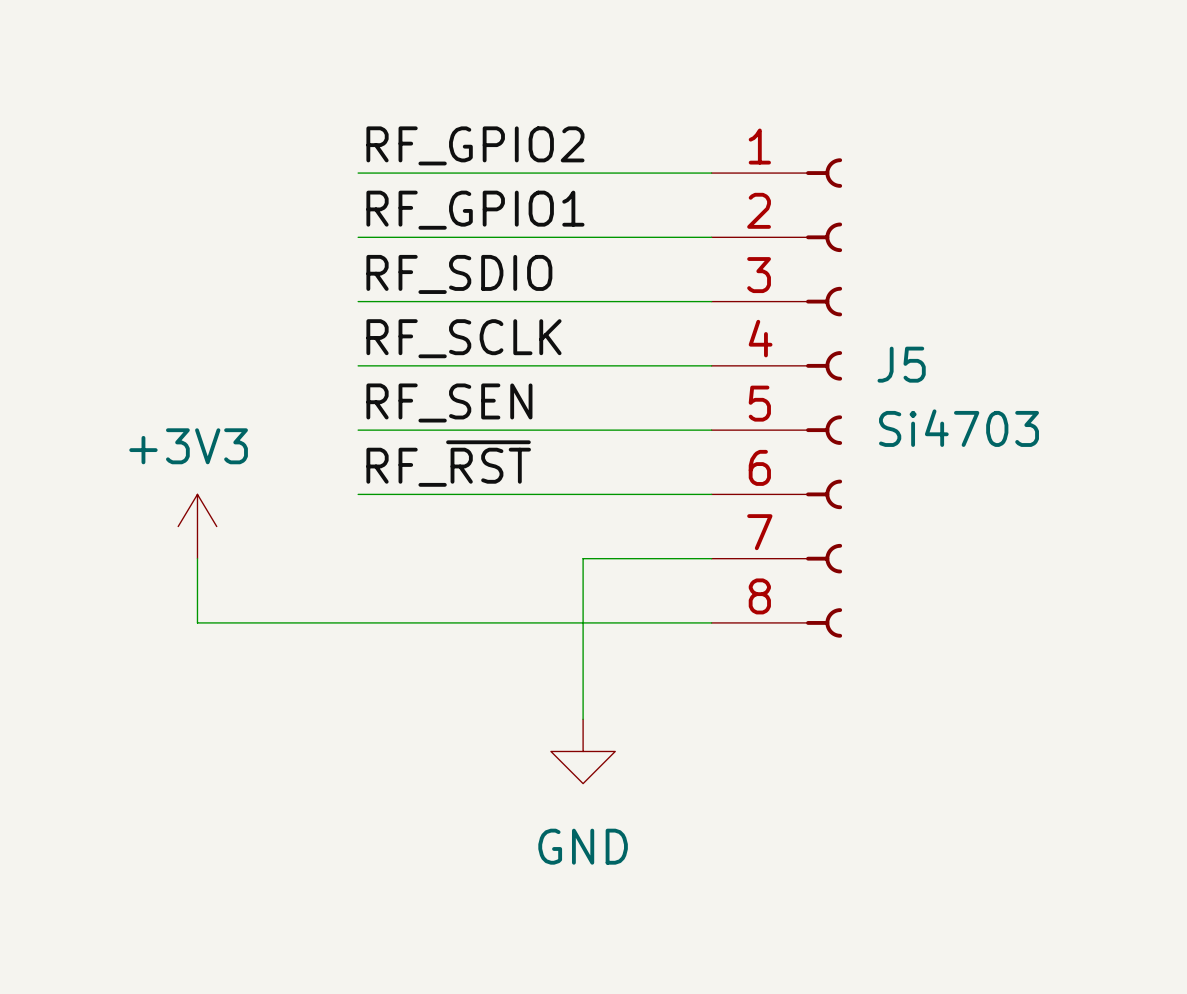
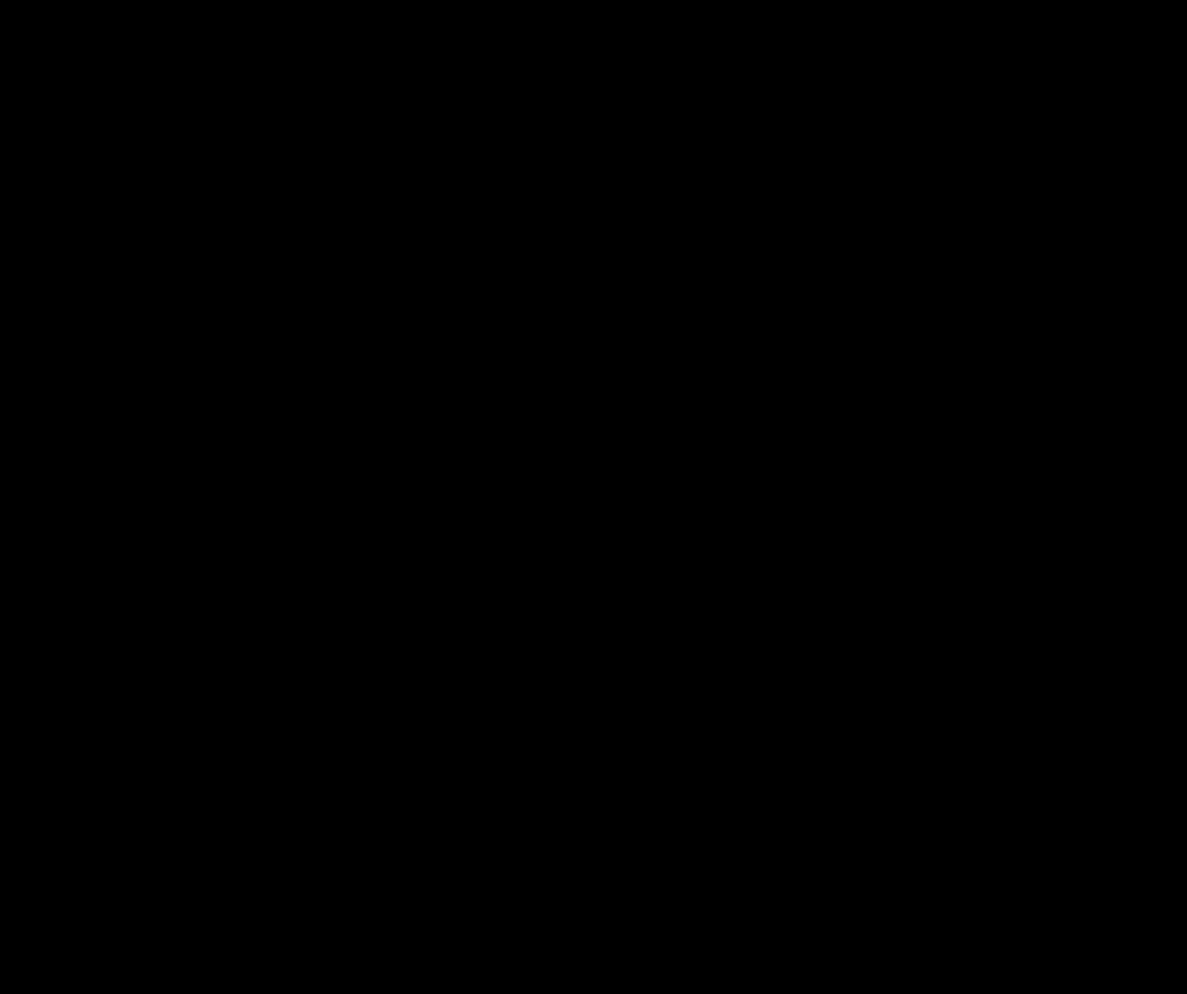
label: RF_GPIO2 (475, 145) -> none
wire: (358, 173) (711, 173) -> none
label: RF_GPIO1 (475, 210) -> none
wire: (358, 237) (711, 237) -> none
label: RF_SDIO (459, 274) -> none
wire: (358, 301) (711, 301) -> none
label: RF_SCLK (463, 338) -> none
wire: (358, 365) (711, 365) -> none
J5: Si4703 (776, 397) -> none
label: RF_SEN (449, 402) -> none
wire: (358, 430) (711, 430) -> none
label: RF_~{RST} (448, 463) -> none
wire: (358, 494) (711, 494) -> none
power symbol: +3V3 (197, 526) -> none
wire: (197, 558) (197, 622) (711, 622) -> none
wire: (711, 558) (583, 558) (583, 719) -> none
power symbol: GND (583, 751) -> none

